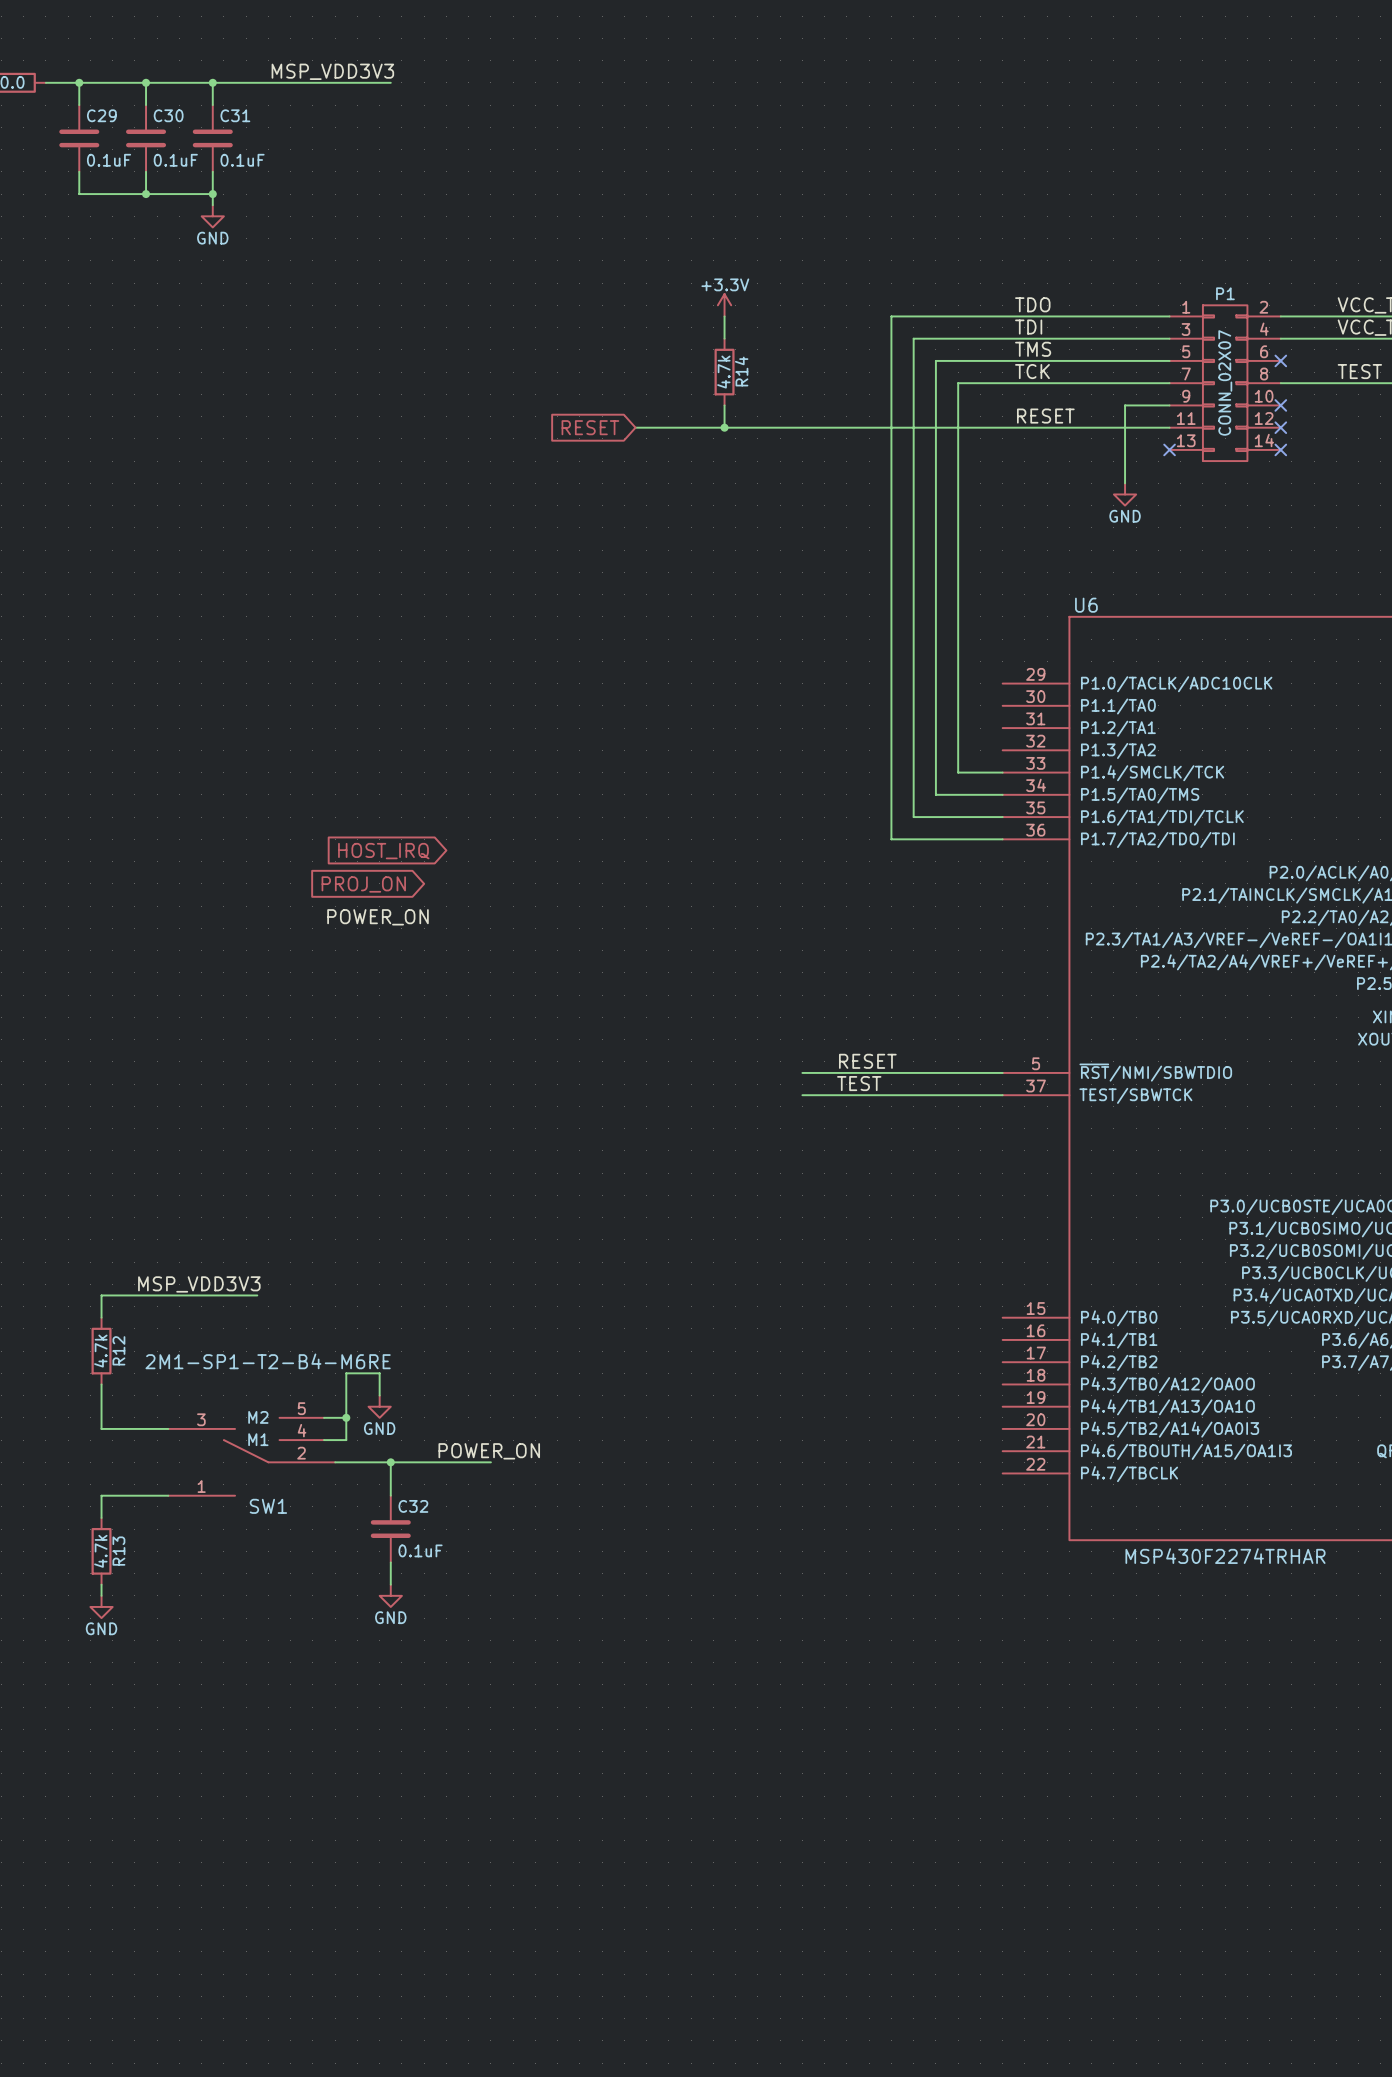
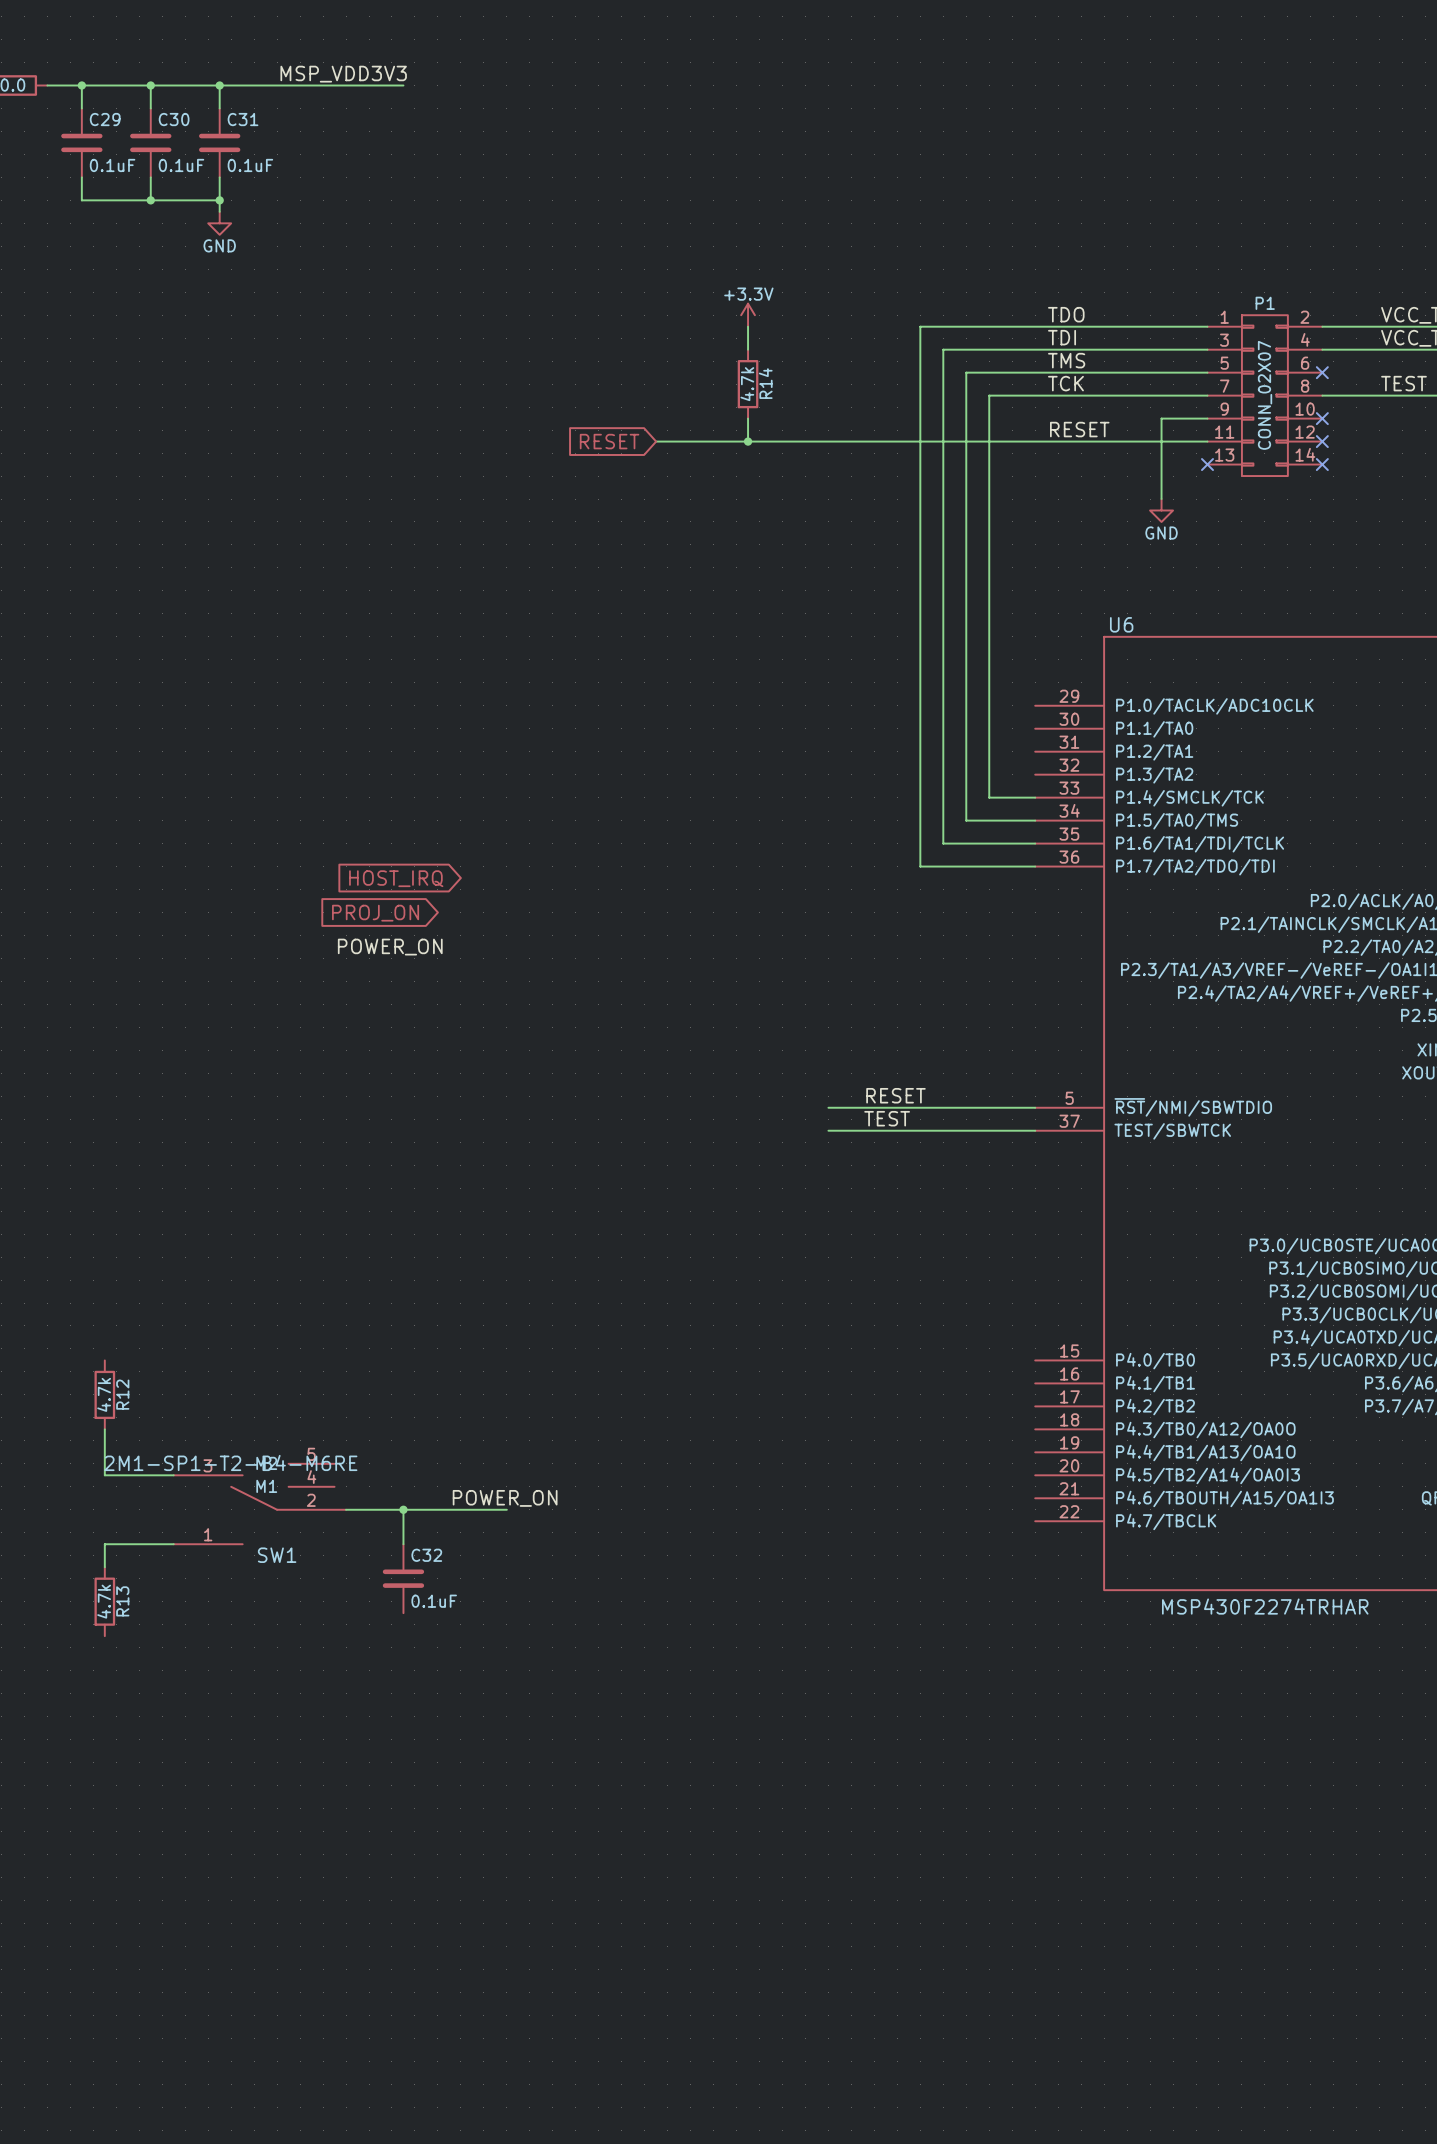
label: MSP_VDD3V3 (199, 1284) -> none
wire: (257, 1295) (101, 1295) (101, 1317) -> none
SW1 value position: 2M1-SP1-T2-B4-M6RE (268, 1361) -> 2M1-SP1-T2-B4-M6RE (230, 1462)
wire: (379, 1395) (379, 1373) (346, 1373) (346, 1440) (324, 1440) -> none
power symbol: GND (379, 1406) -> none
junction: (346, 1417) -> none
wire: (390, 1562) (390, 1584) -> none
wire: (101, 1584) (101, 1595) -> none
power symbol: GND (390, 1595) -> none
power symbol: GND (101, 1606) -> none

